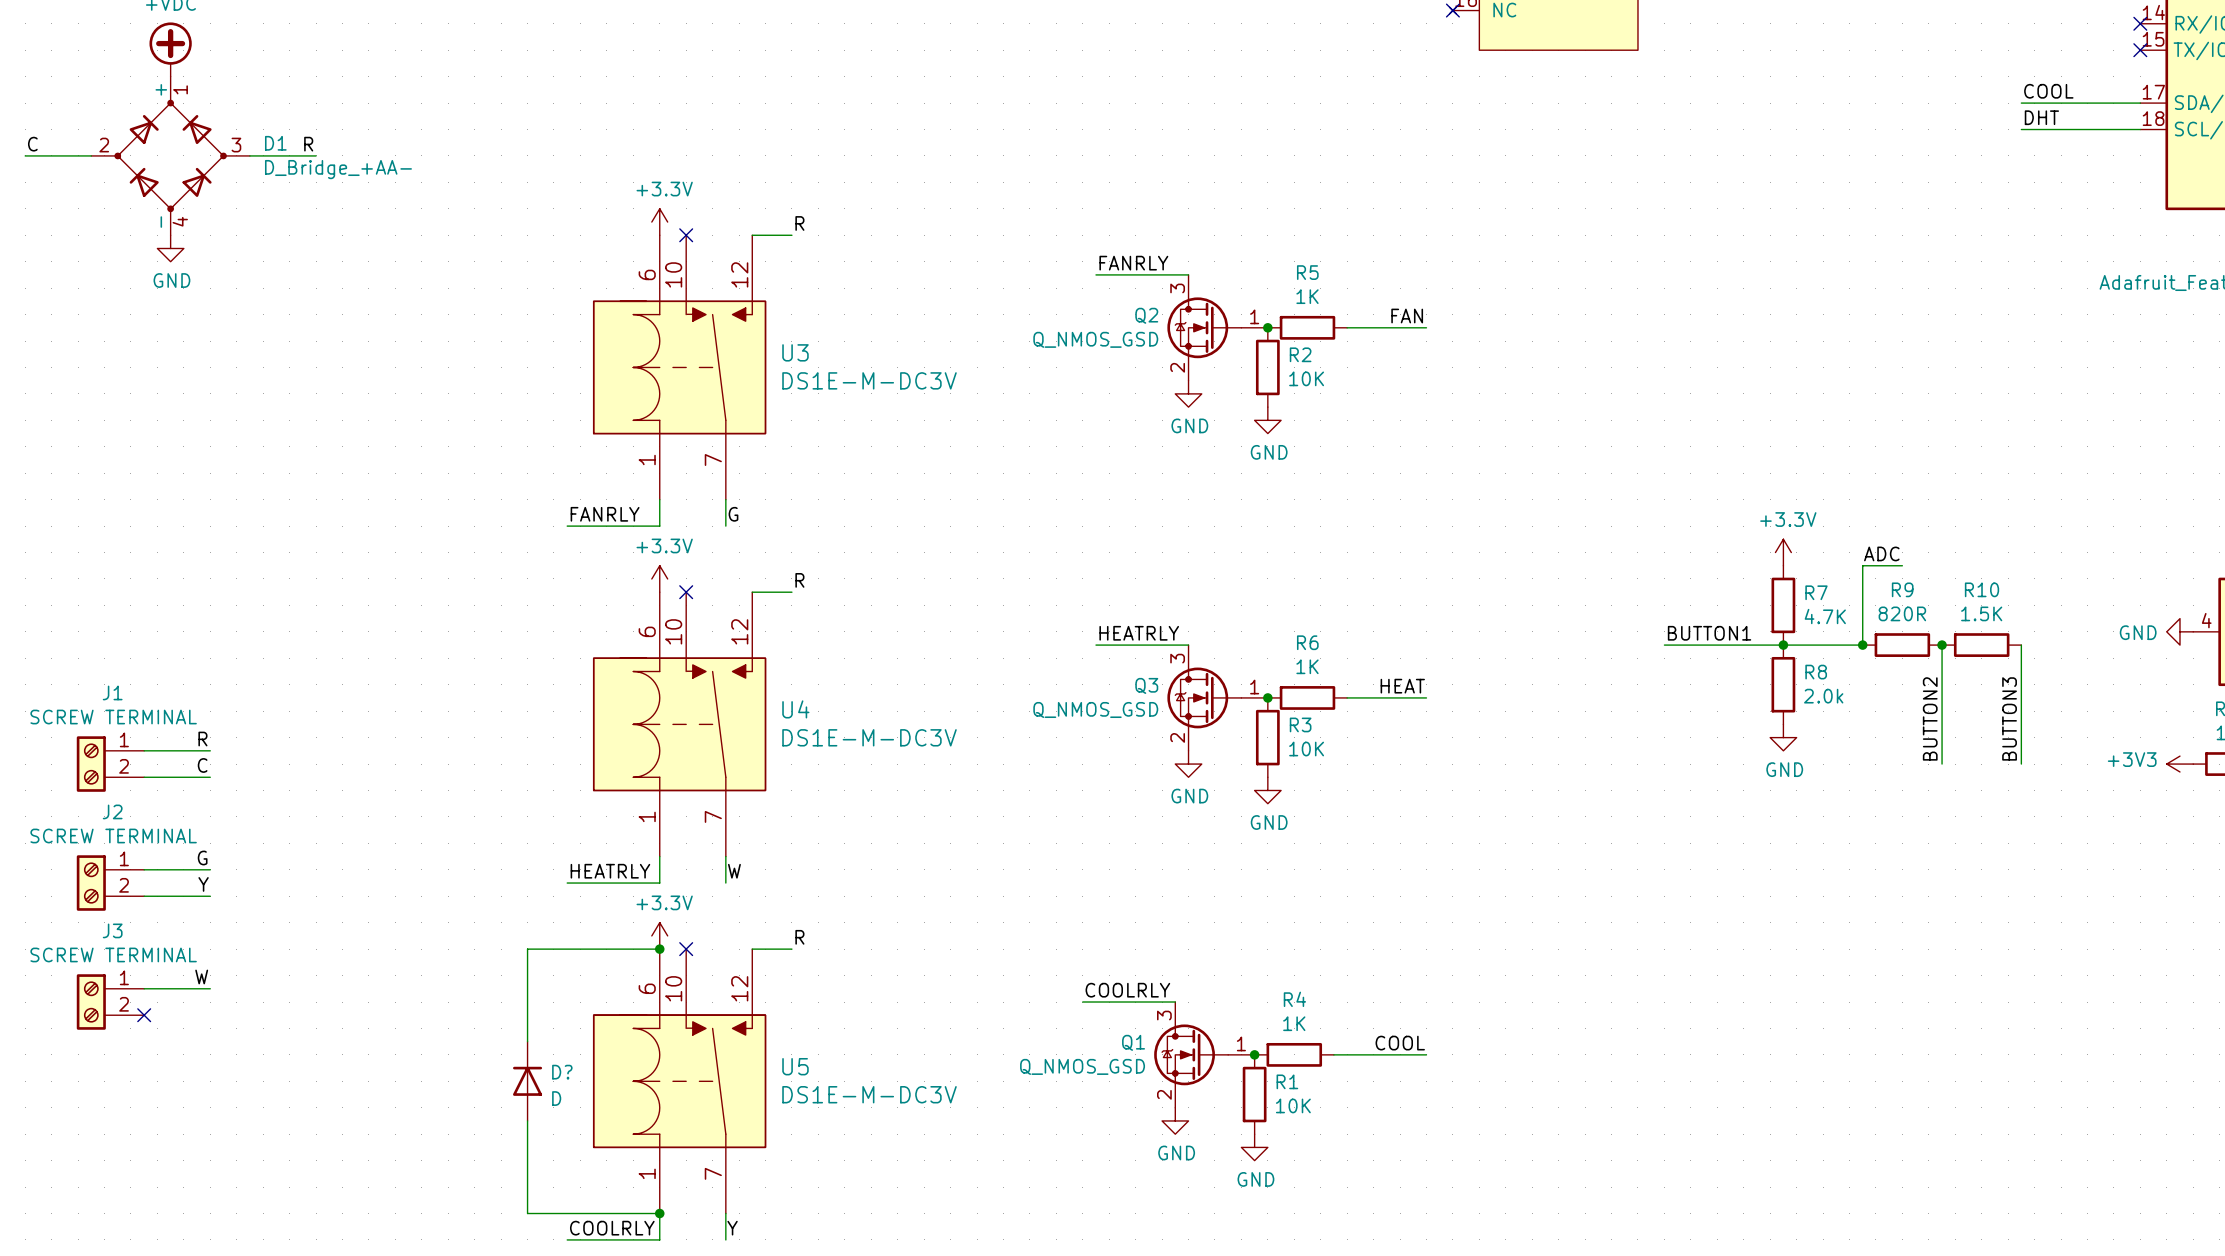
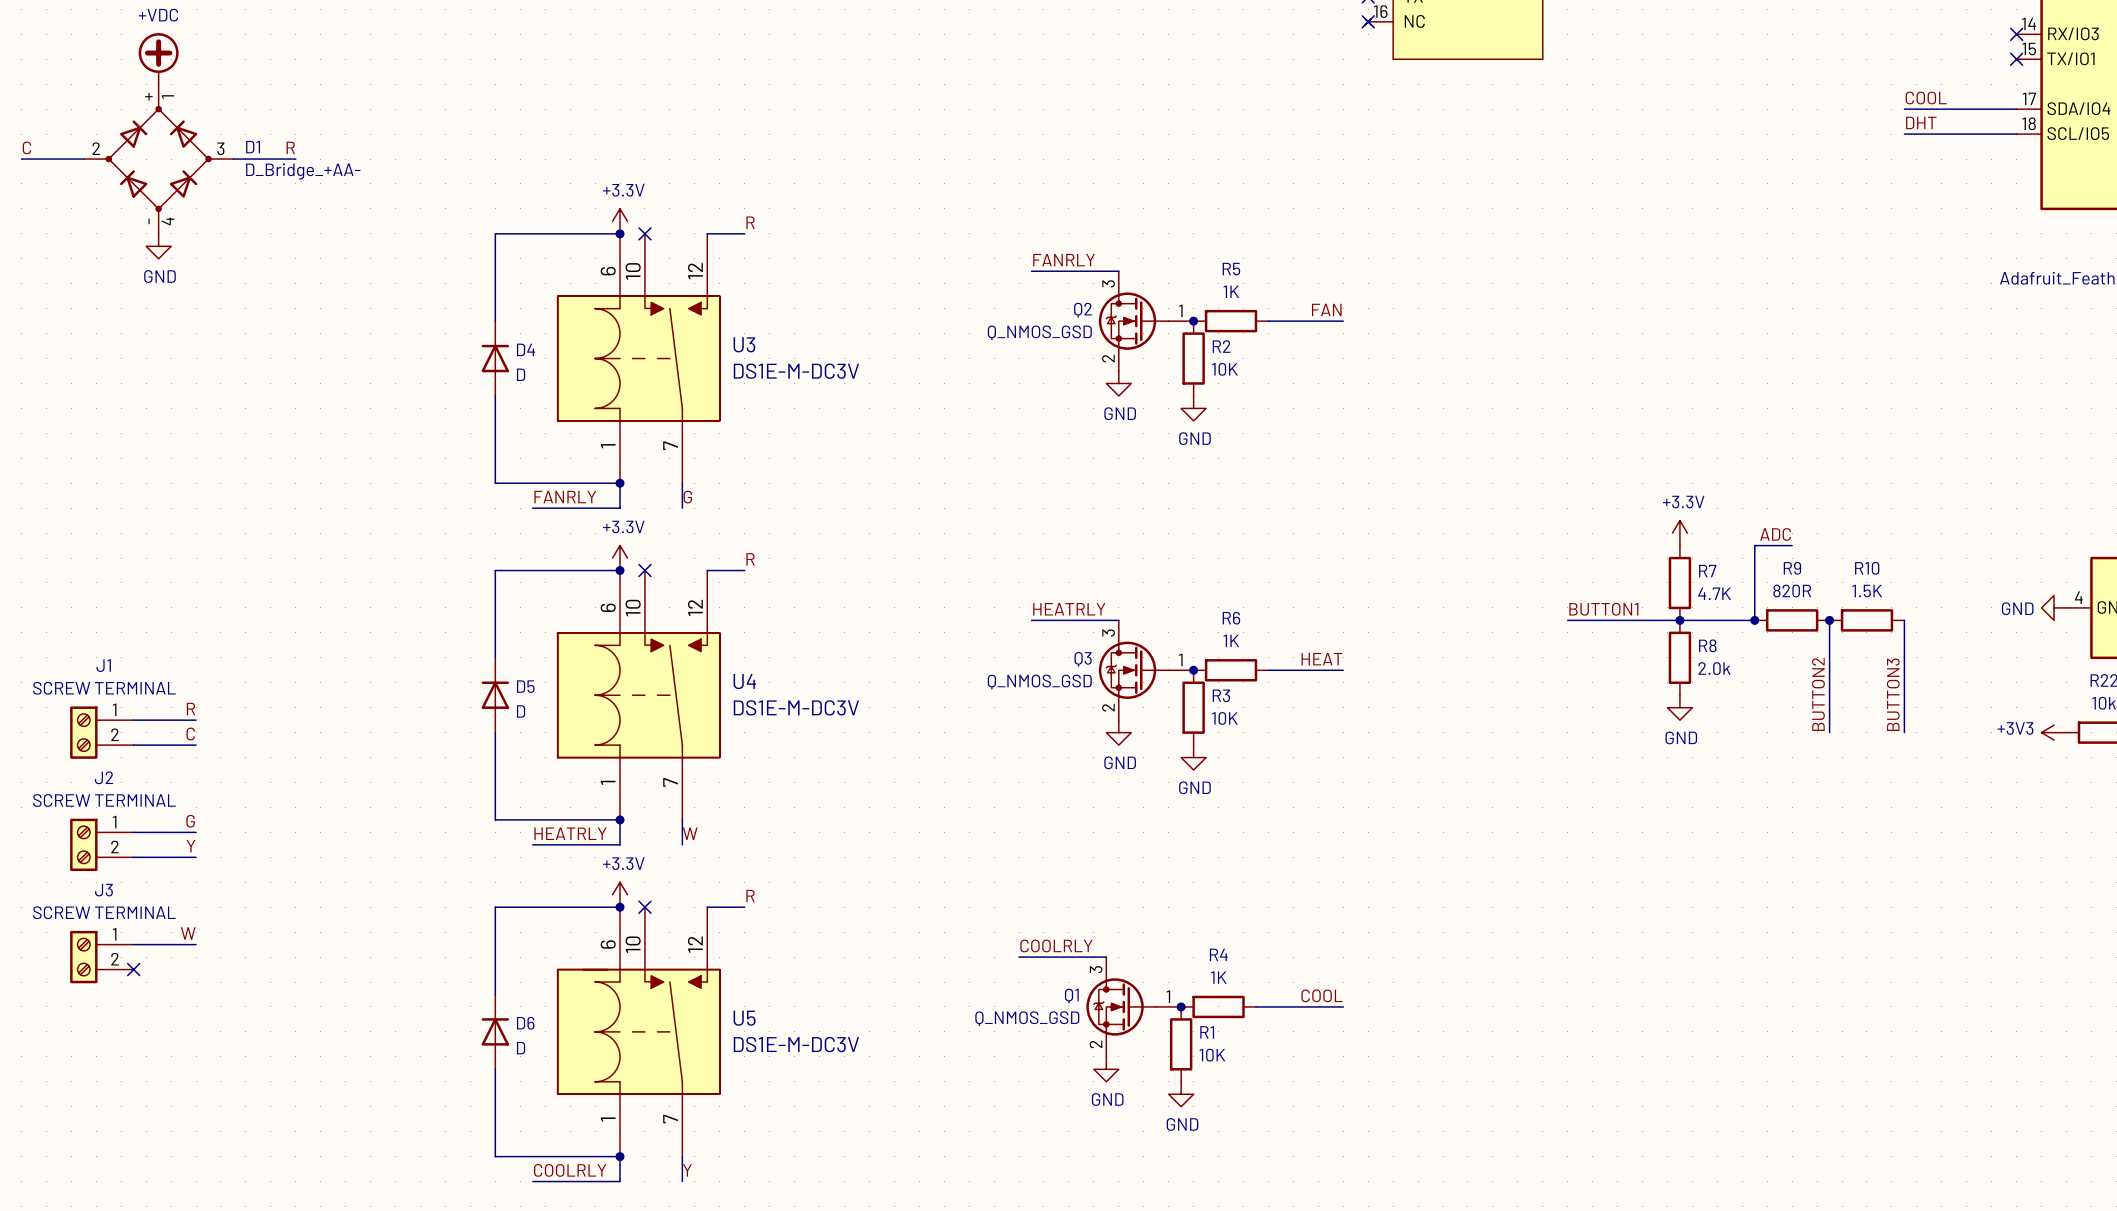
wire: none -> (620, 233) (495, 233) (495, 321)
junction: none -> (620, 233)
D4: none -> D (495, 358)
wire: none -> (495, 395) (495, 483) (620, 483)
junction: none -> (620, 483)
wire: none -> (620, 570) (495, 570) (495, 657)
junction: none -> (620, 570)
D5: none -> D (495, 695)
wire: none -> (495, 732) (495, 819) (620, 819)
junction: none -> (620, 819)
D? name: D? (562, 1072) -> D6 (525, 1023)

